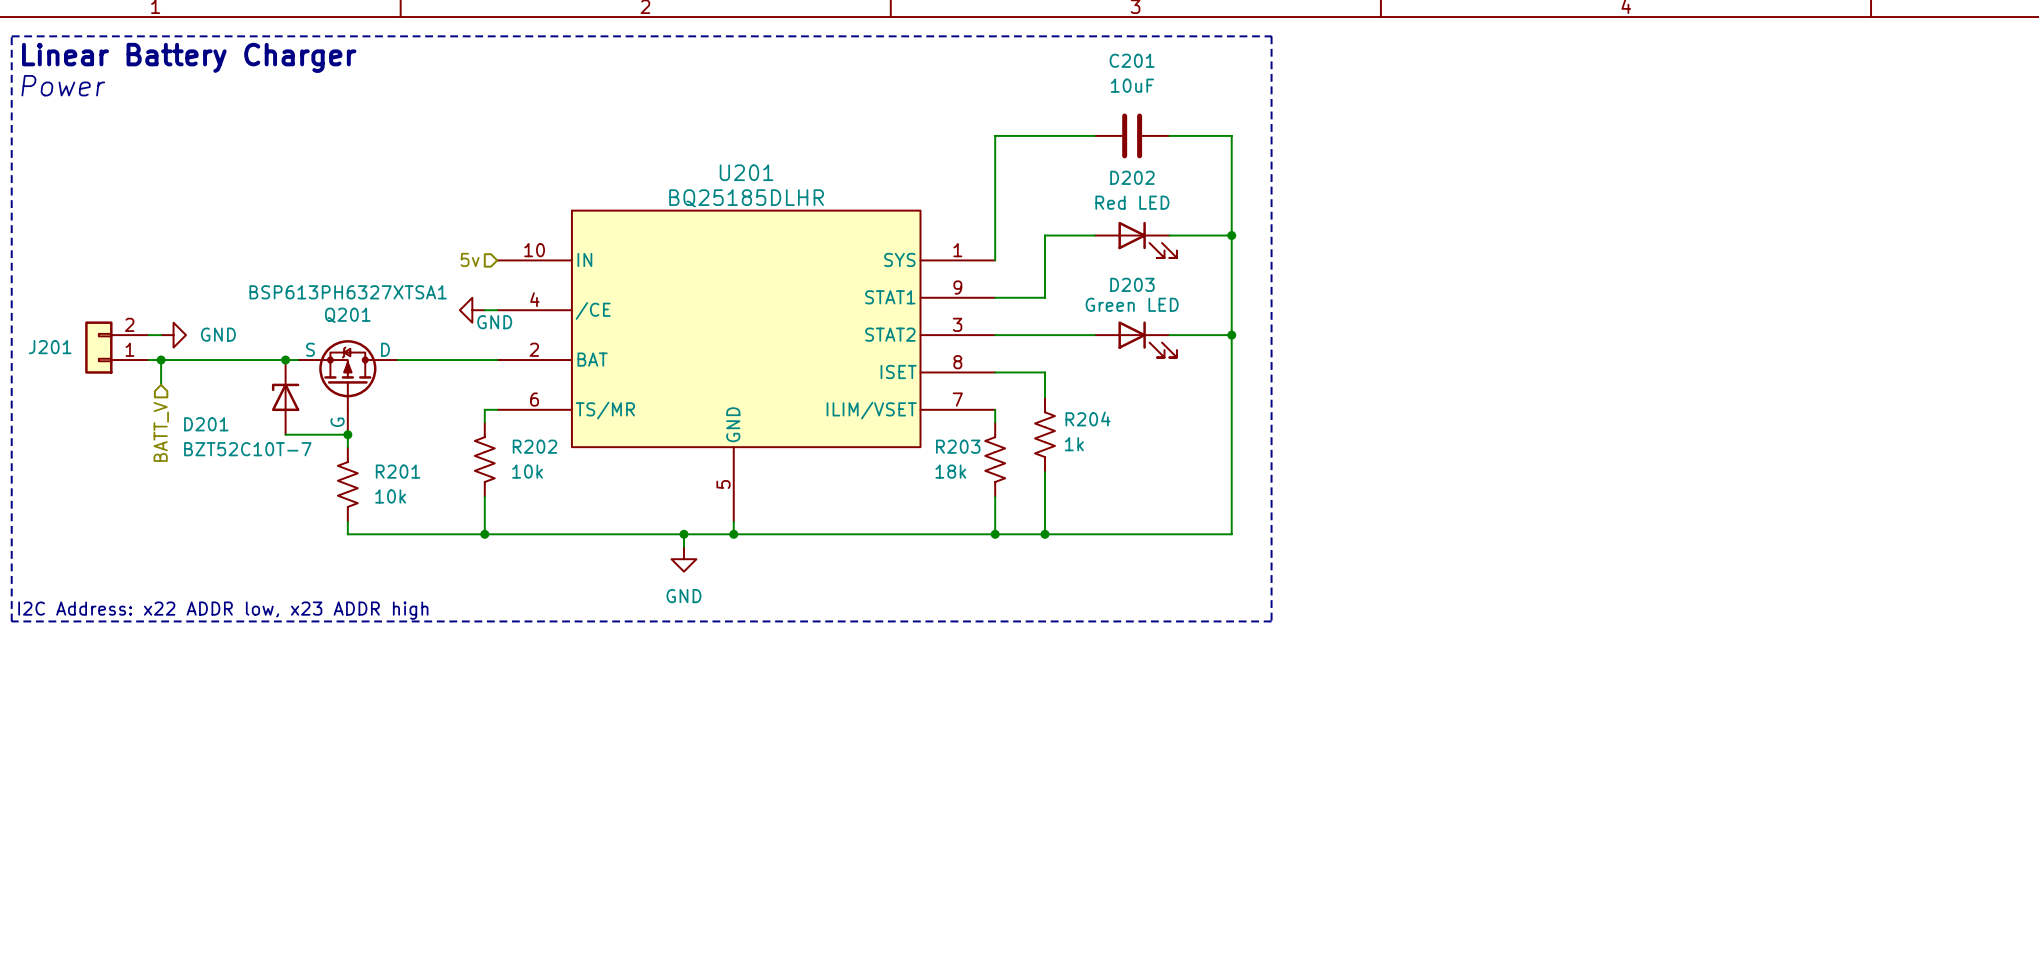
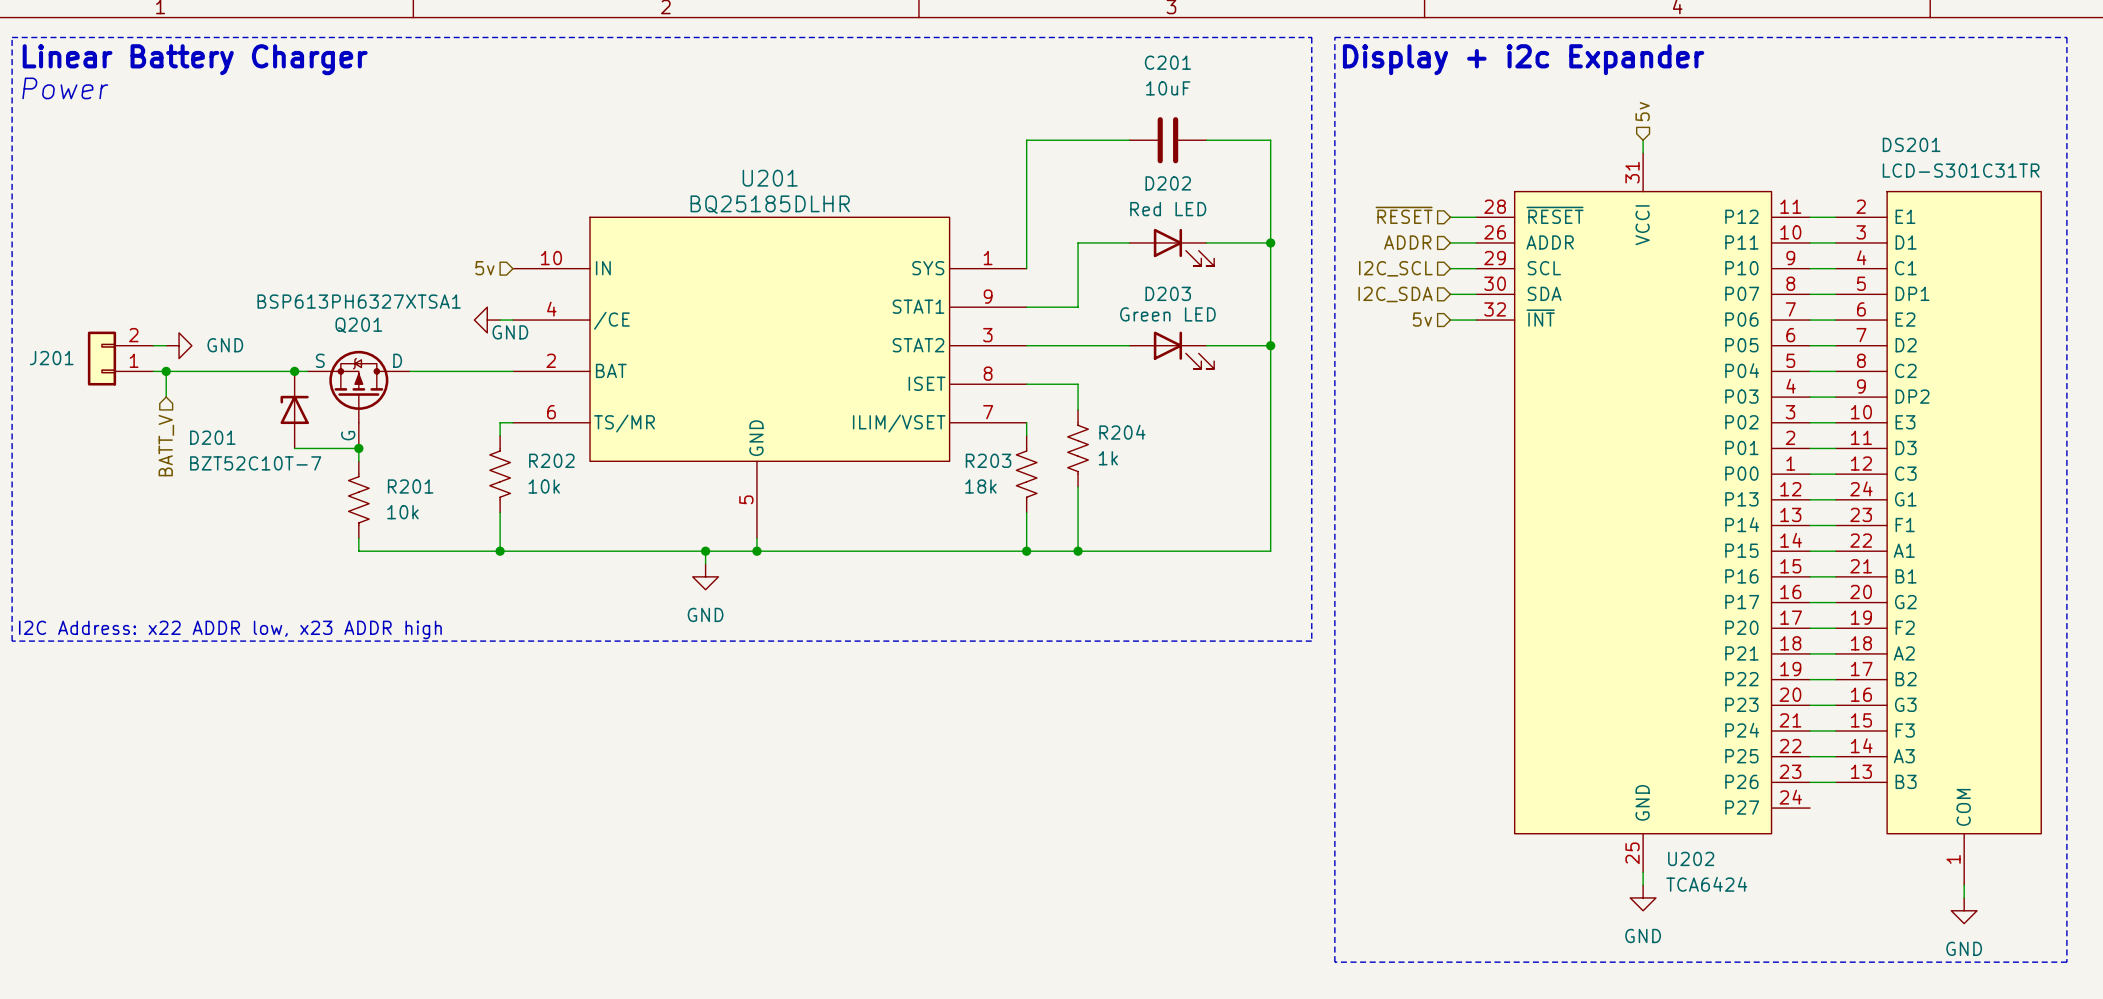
line: none -> (1334, 37) (2066, 37) (2066, 962) (1334, 962) (1334, 37)
text: none -> Display + i2c Expander (1523, 59)
hierarchical label: none -> 5v (1642, 111)
wire: none -> (1643, 140) (1643, 153)
hierarchical label: none -> ~{RESET} (1404, 215)
wire: none -> (1450, 217) (1476, 217)
wire: none -> (1810, 217) (1835, 217)
hierarchical label: none -> ADDR (1407, 242)
wire: none -> (1450, 242) (1476, 242)
wire: none -> (1810, 242) (1835, 242)
hierarchical label: none -> I2C_SCL (1395, 268)
wire: none -> (1450, 268) (1476, 268)
wire: none -> (1810, 268) (1835, 268)
hierarchical label: none -> I2C_SDA (1395, 294)
wire: none -> (1450, 294) (1476, 294)
wire: none -> (1810, 294) (1835, 294)
hierarchical label: none -> 5v (1422, 319)
wire: none -> (1450, 320) (1476, 320)
wire: none -> (1810, 320) (1835, 320)
wire: none -> (1810, 345) (1835, 345)
wire: none -> (1810, 371) (1835, 371)
wire: none -> (1810, 397) (1835, 397)
wire: none -> (1810, 422) (1835, 422)
wire: none -> (1810, 448) (1835, 448)
wire: none -> (1810, 474) (1835, 474)
wire: none -> (1810, 499) (1835, 499)
U202: none -> TCA6424 (1643, 512)
wire: none -> (1810, 525) (1835, 525)
DS201: none -> LCD-S301C31TR (1938, 538)
wire: none -> (1810, 551) (1835, 551)
wire: none -> (1810, 576) (1835, 576)
wire: none -> (1810, 602) (1835, 602)
wire: none -> (1810, 628) (1835, 628)
wire: none -> (1810, 653) (1835, 653)
wire: none -> (1810, 679) (1835, 679)
wire: none -> (1810, 705) (1835, 705)
wire: none -> (1810, 730) (1835, 730)
wire: none -> (1810, 756) (1835, 756)
wire: none -> (1810, 782) (1835, 782)
wire: none -> (1643, 872) (1643, 885)
wire: none -> (1964, 885) (1964, 897)
power symbol: none -> GND (1643, 897)
power symbol: none -> GND (1964, 910)

